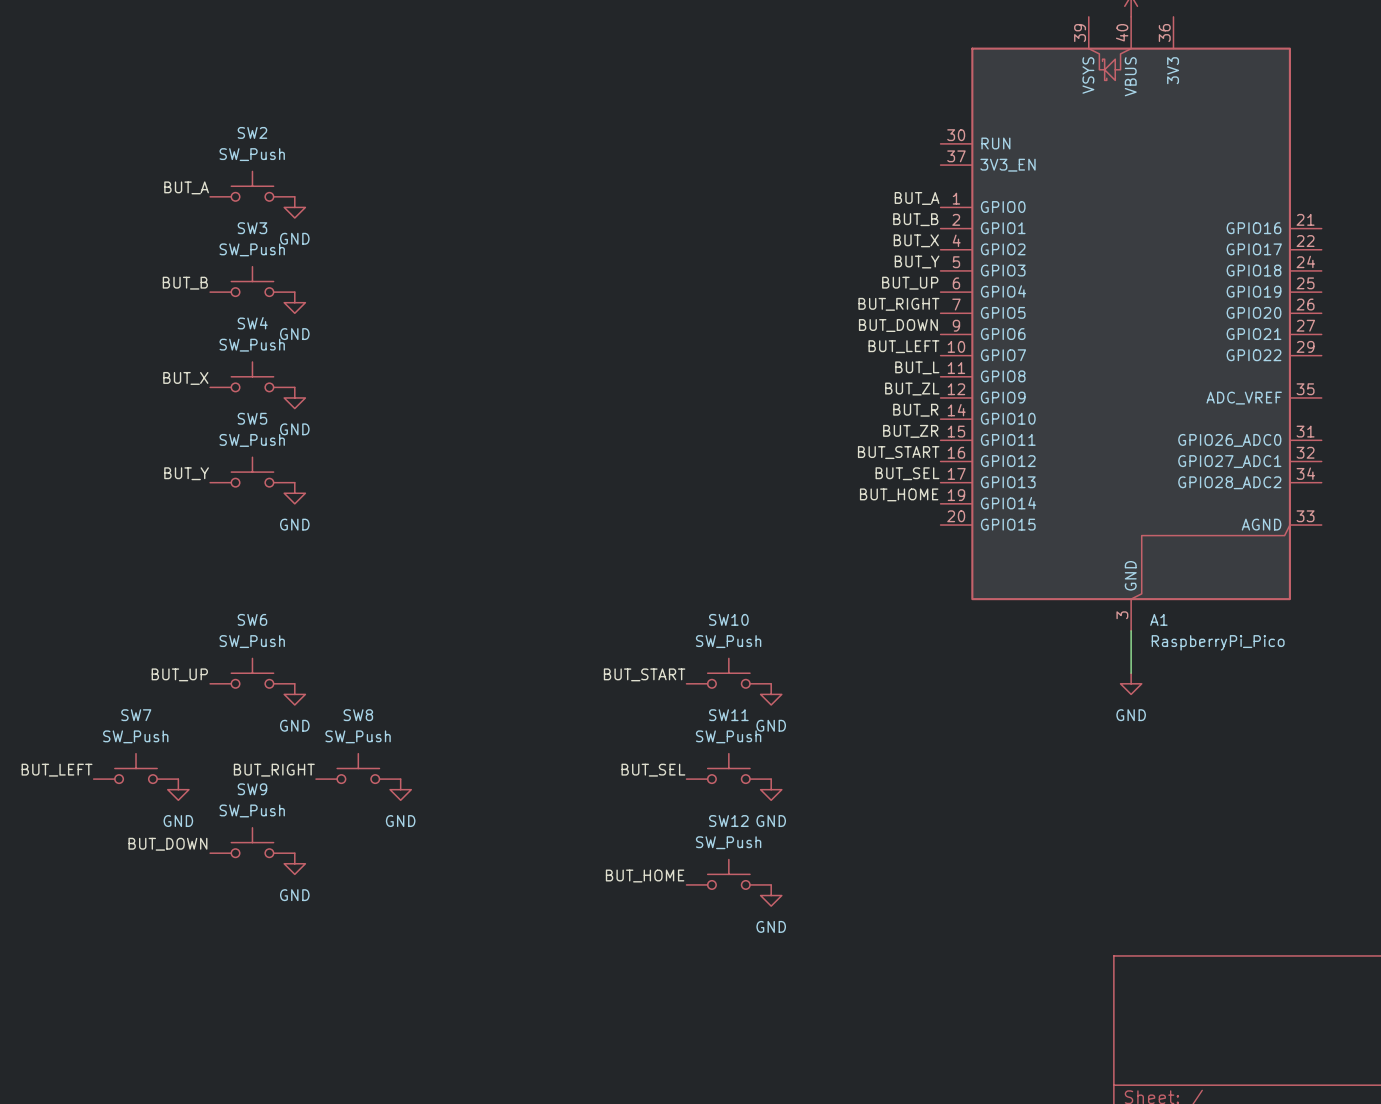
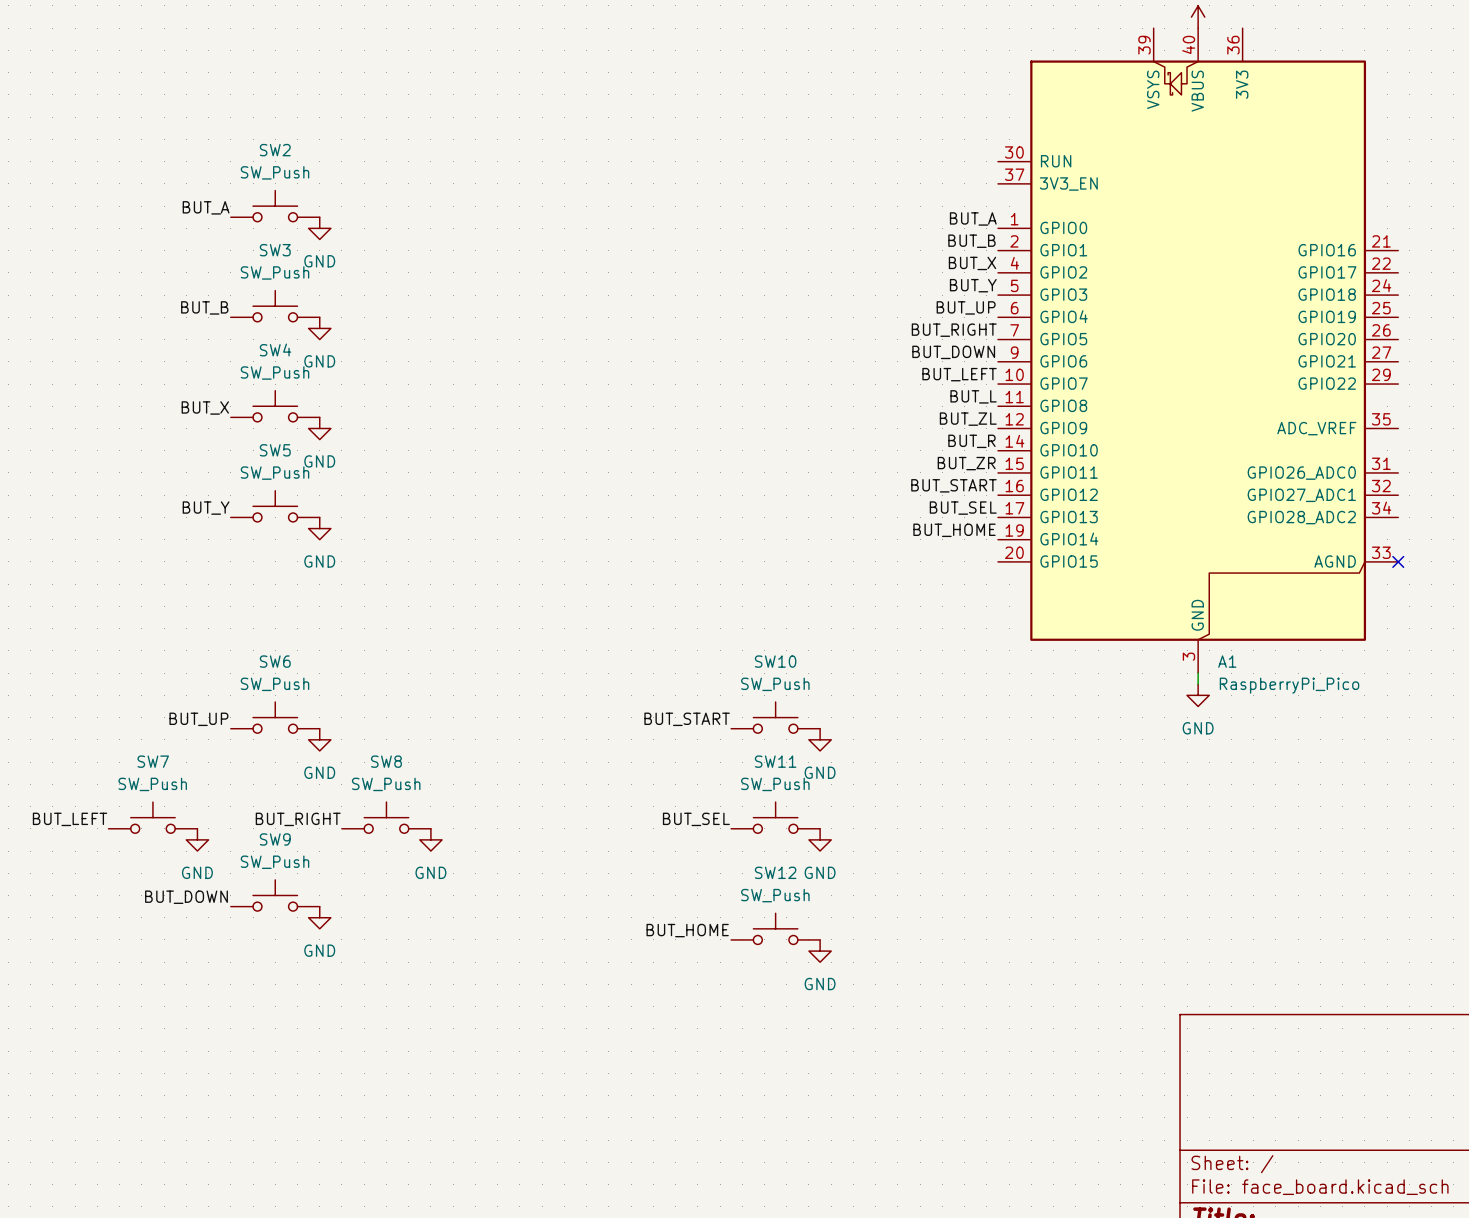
no-connect mark: none -> (1398, 561)
wire: (1131, 641) (1131, 673) -> none
power symbol position: GND (1131, 683) -> GND (1198, 695)

